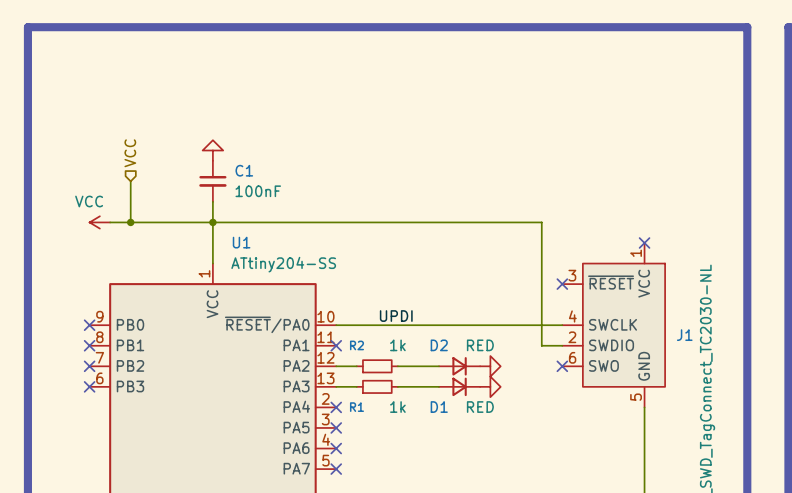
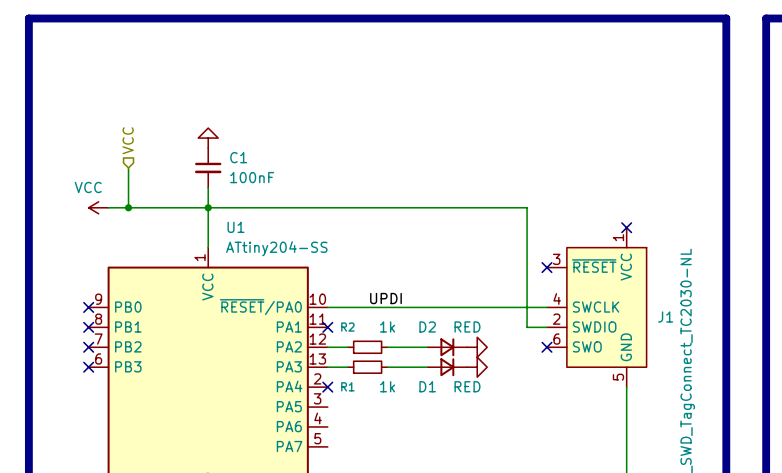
no-connect mark: (336, 427) -> none
no-connect mark: (336, 448) -> none
no-connect mark: (336, 469) -> none

